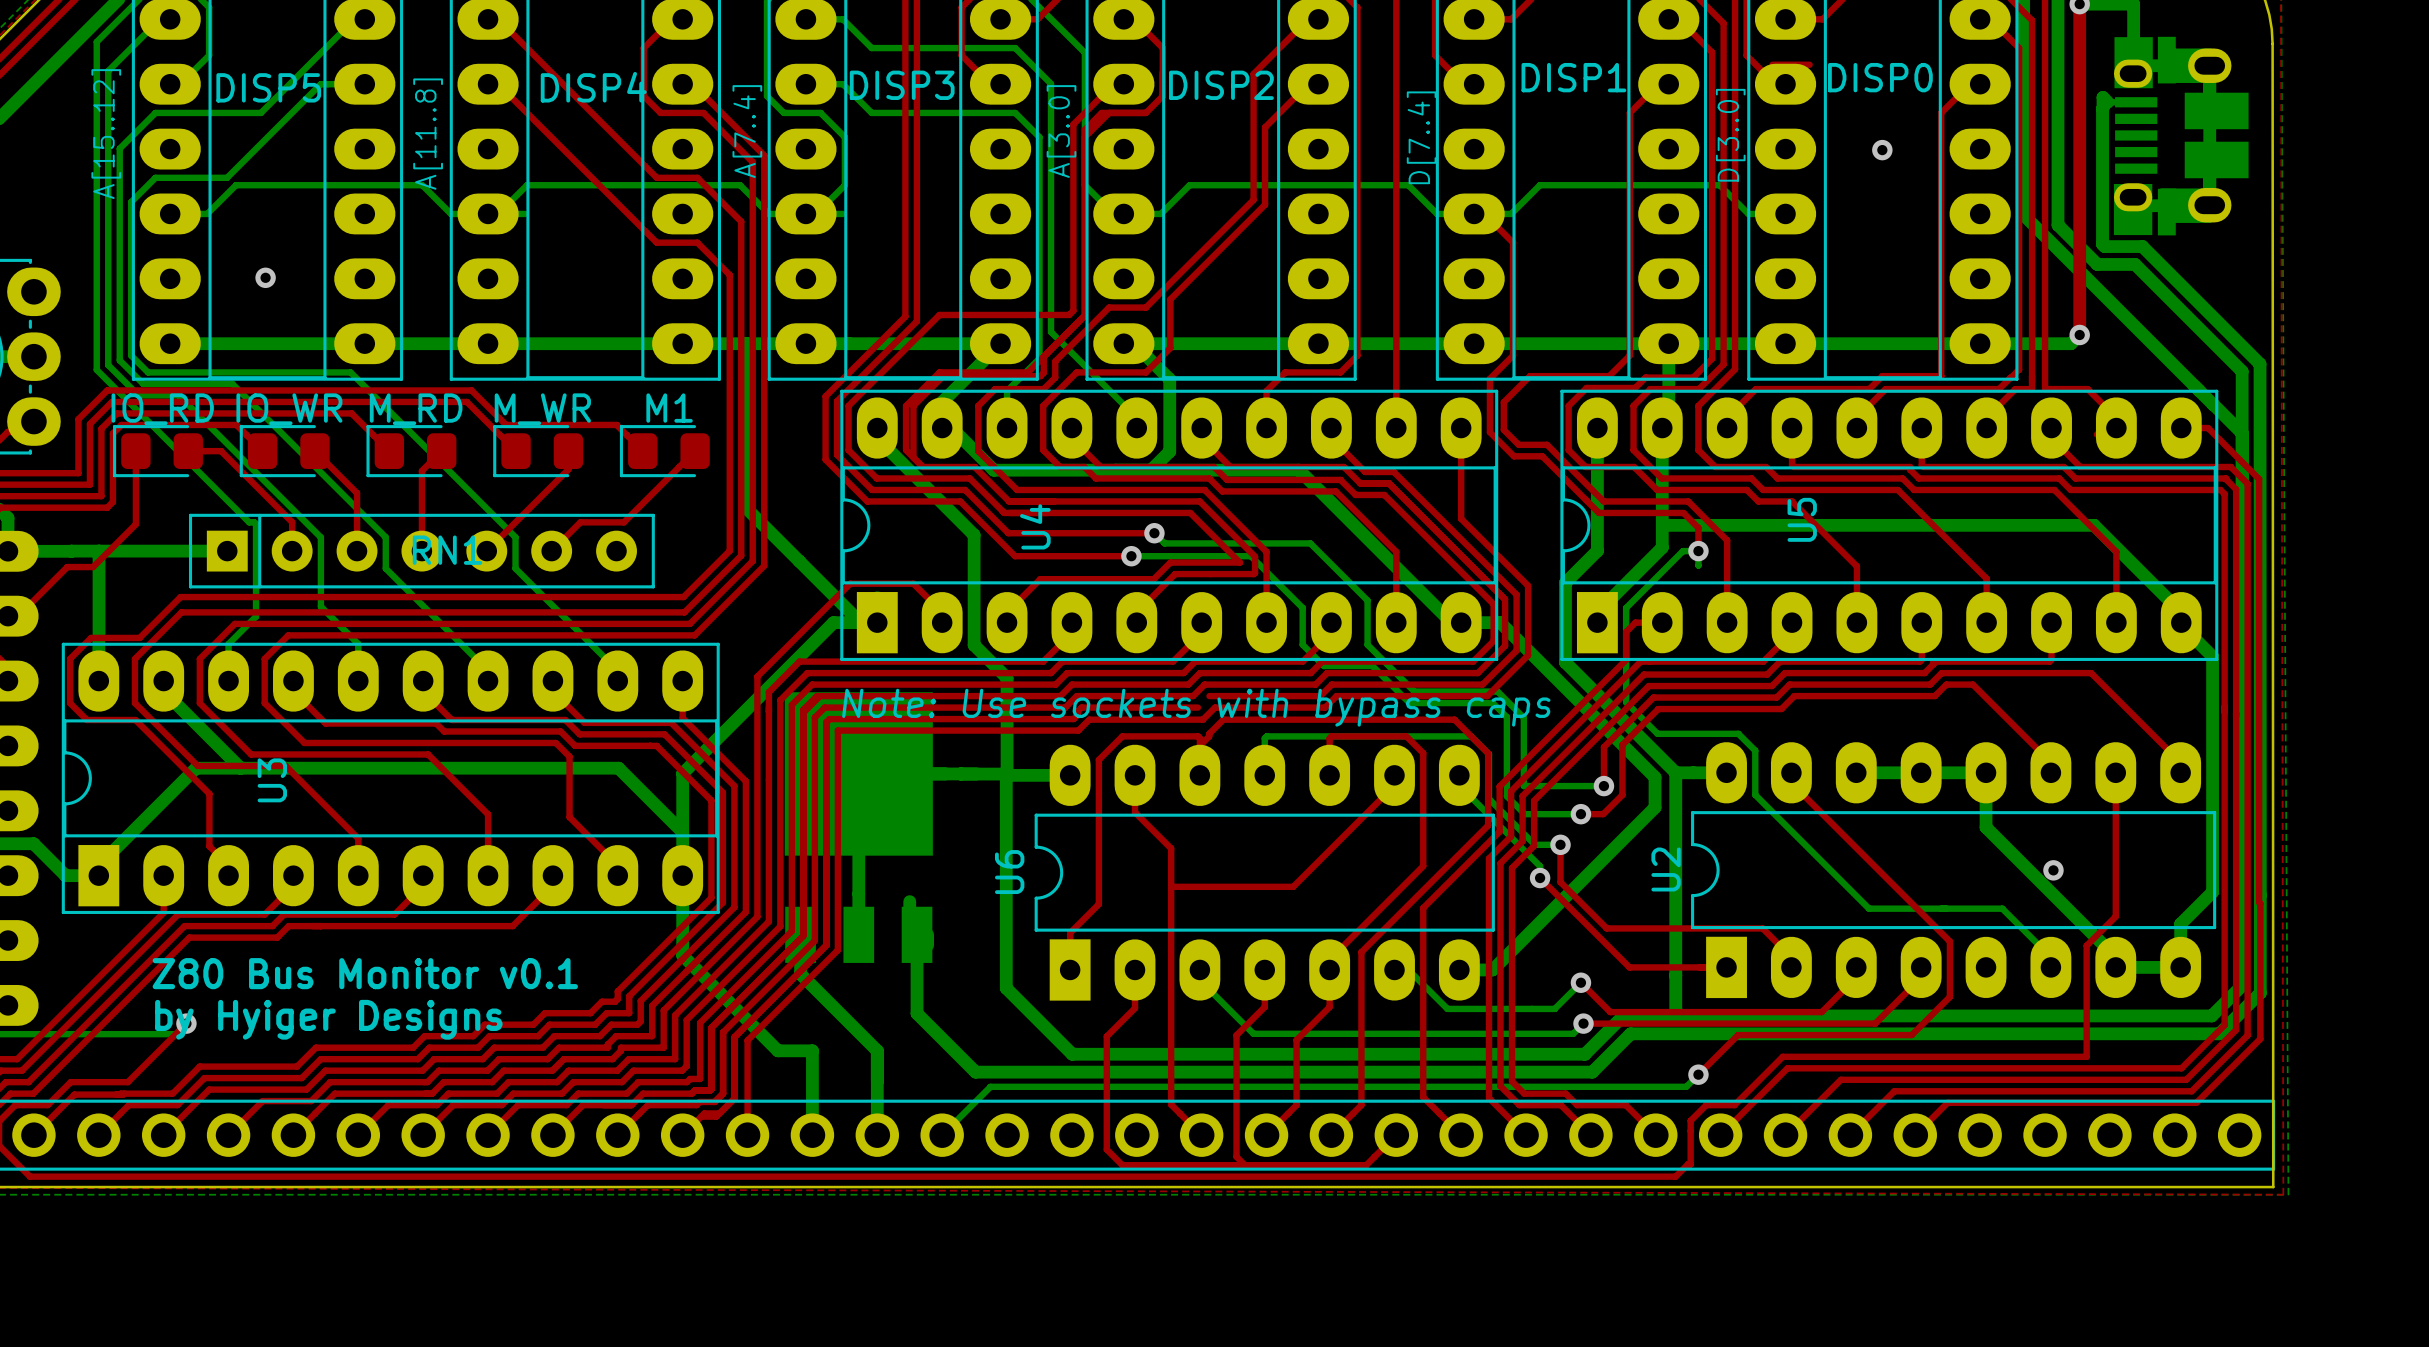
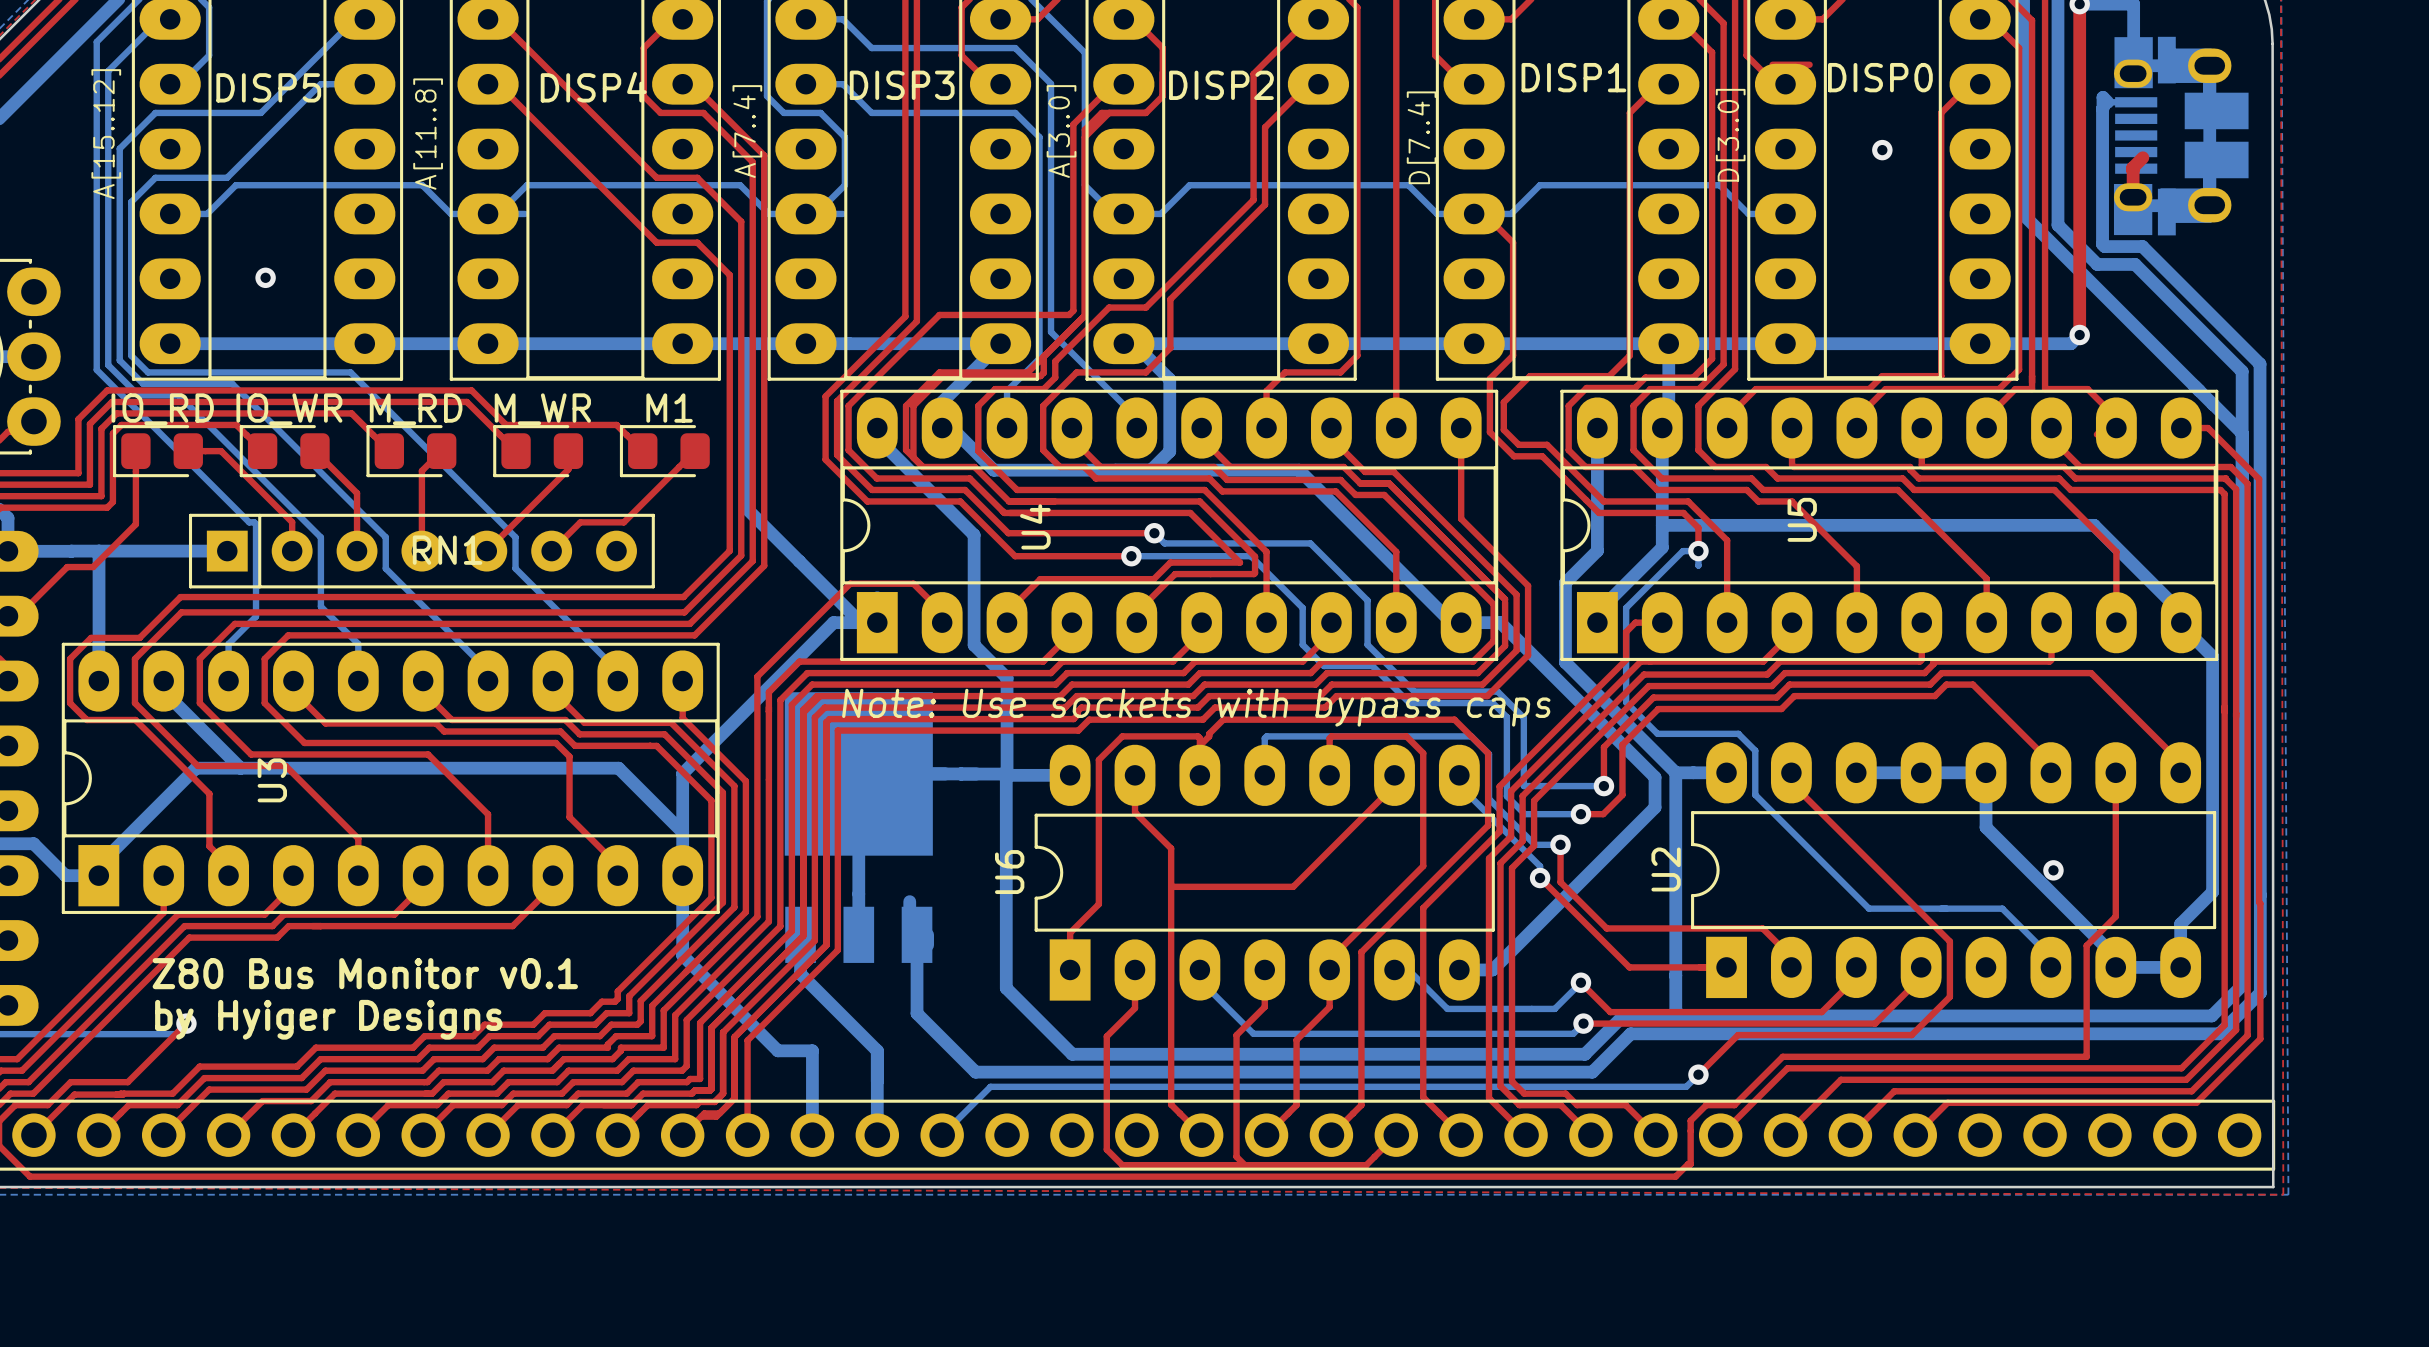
top track: none -> (2142, 157) (2132, 167) (2133, 197)
top track: none -> (1209, 696) (1197, 707)

